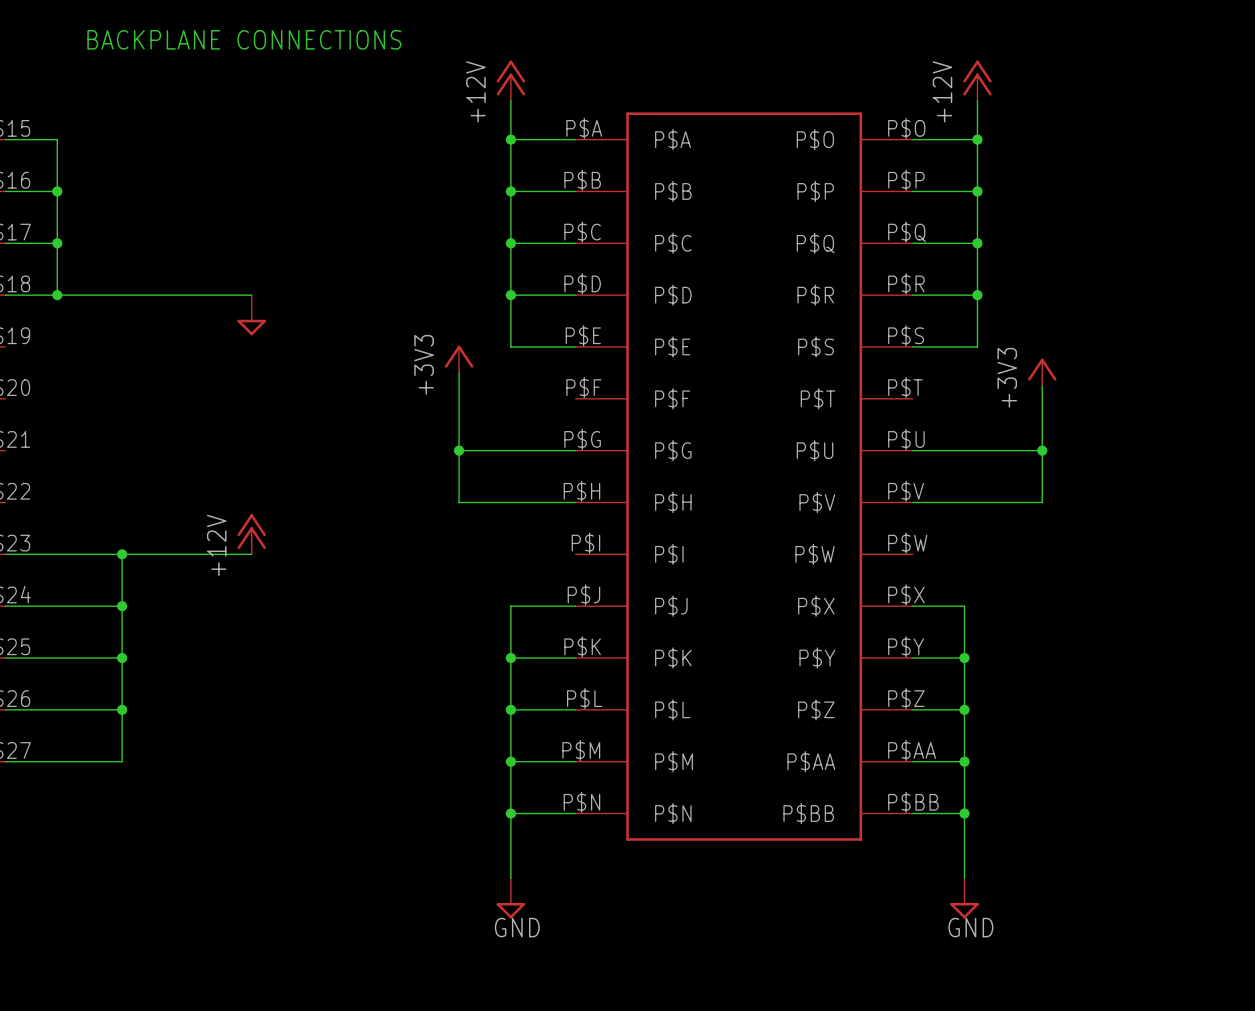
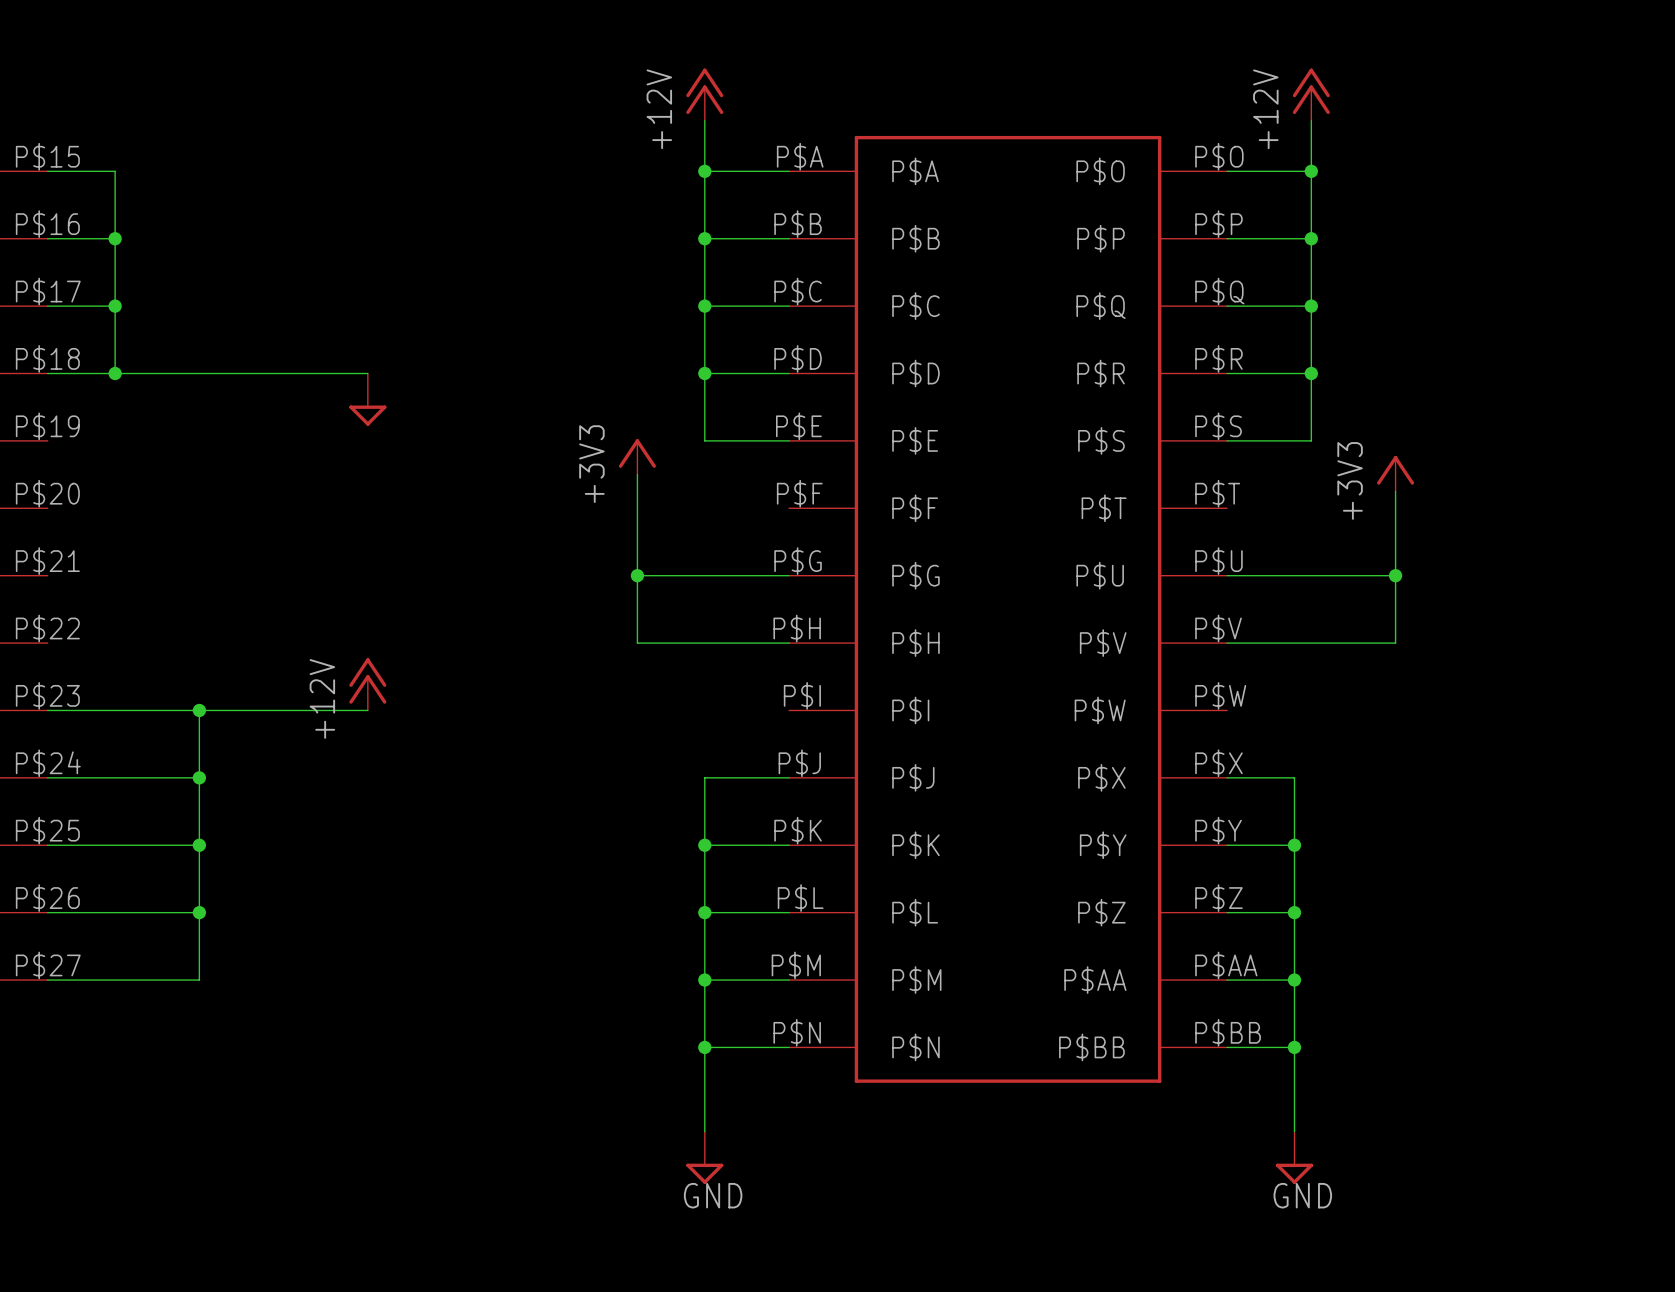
text: BACKPLANE CONNECTIONS (244, 39) -> none

